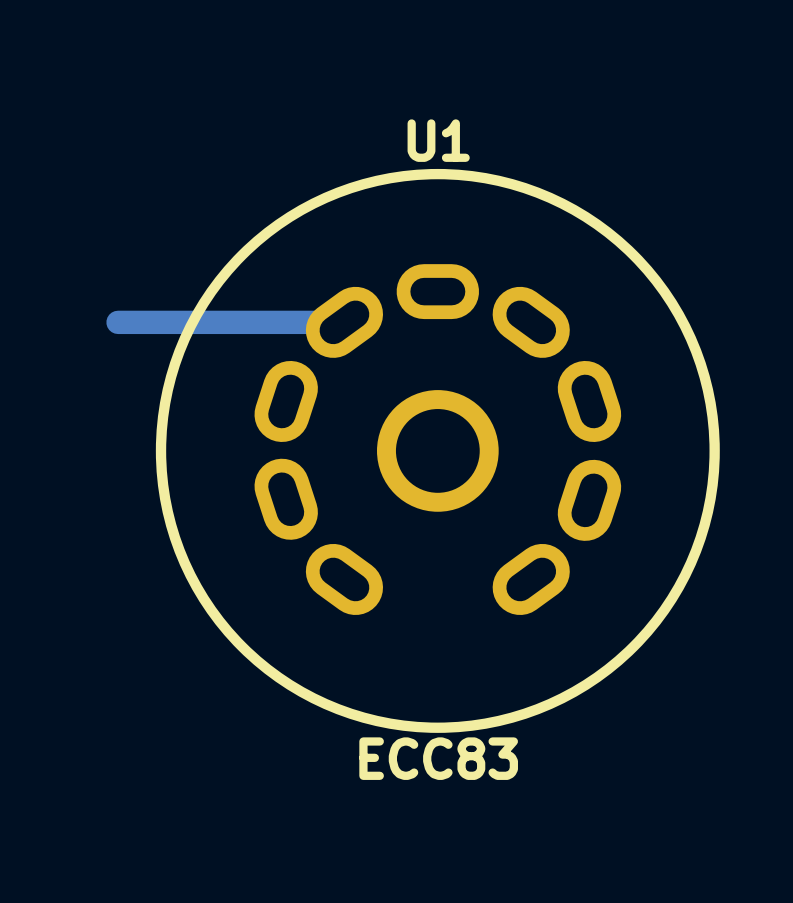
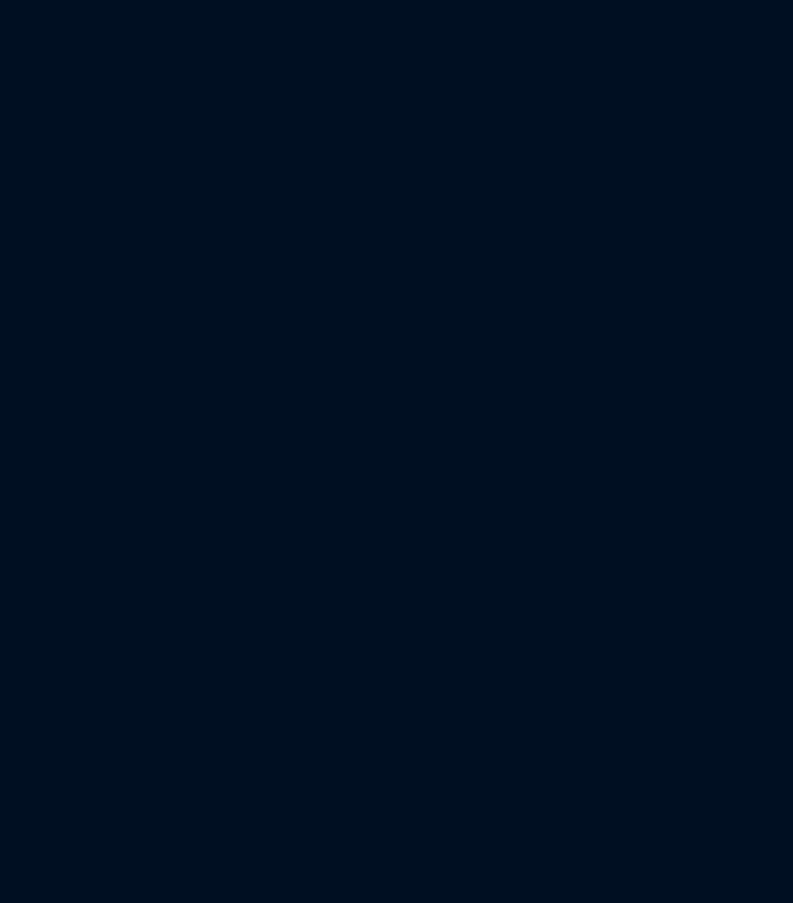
bottom track: (118, 322) (344, 322) -> none
U1: ECC83 (437, 450) -> none

